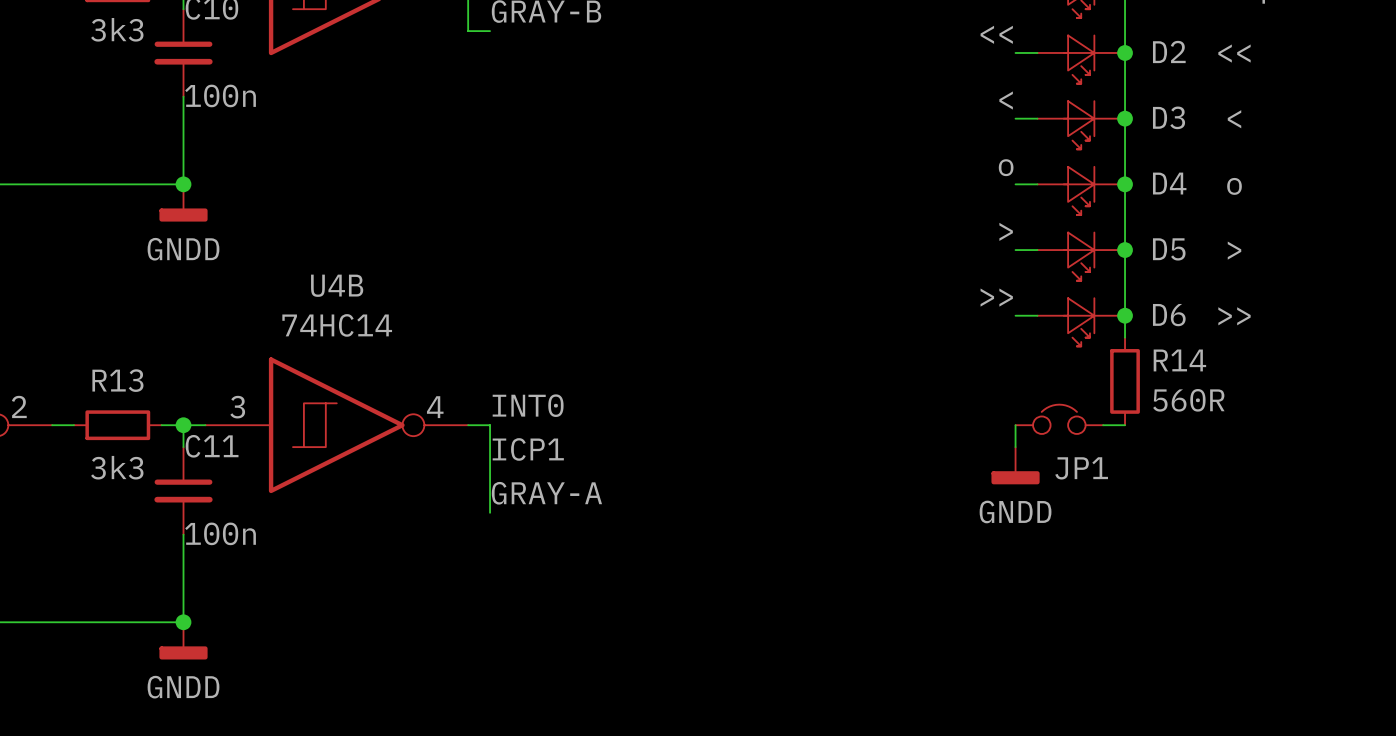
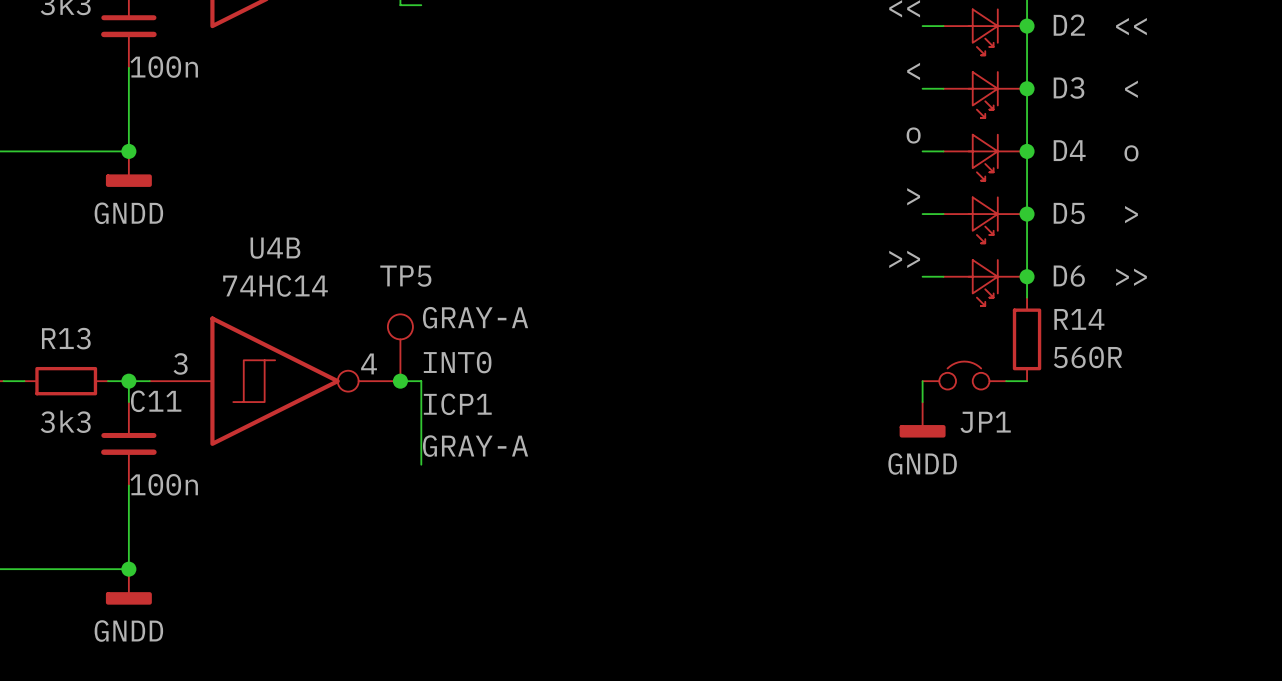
TP5: none -> GRAY-A (400, 347)
junction: none -> (400, 381)

